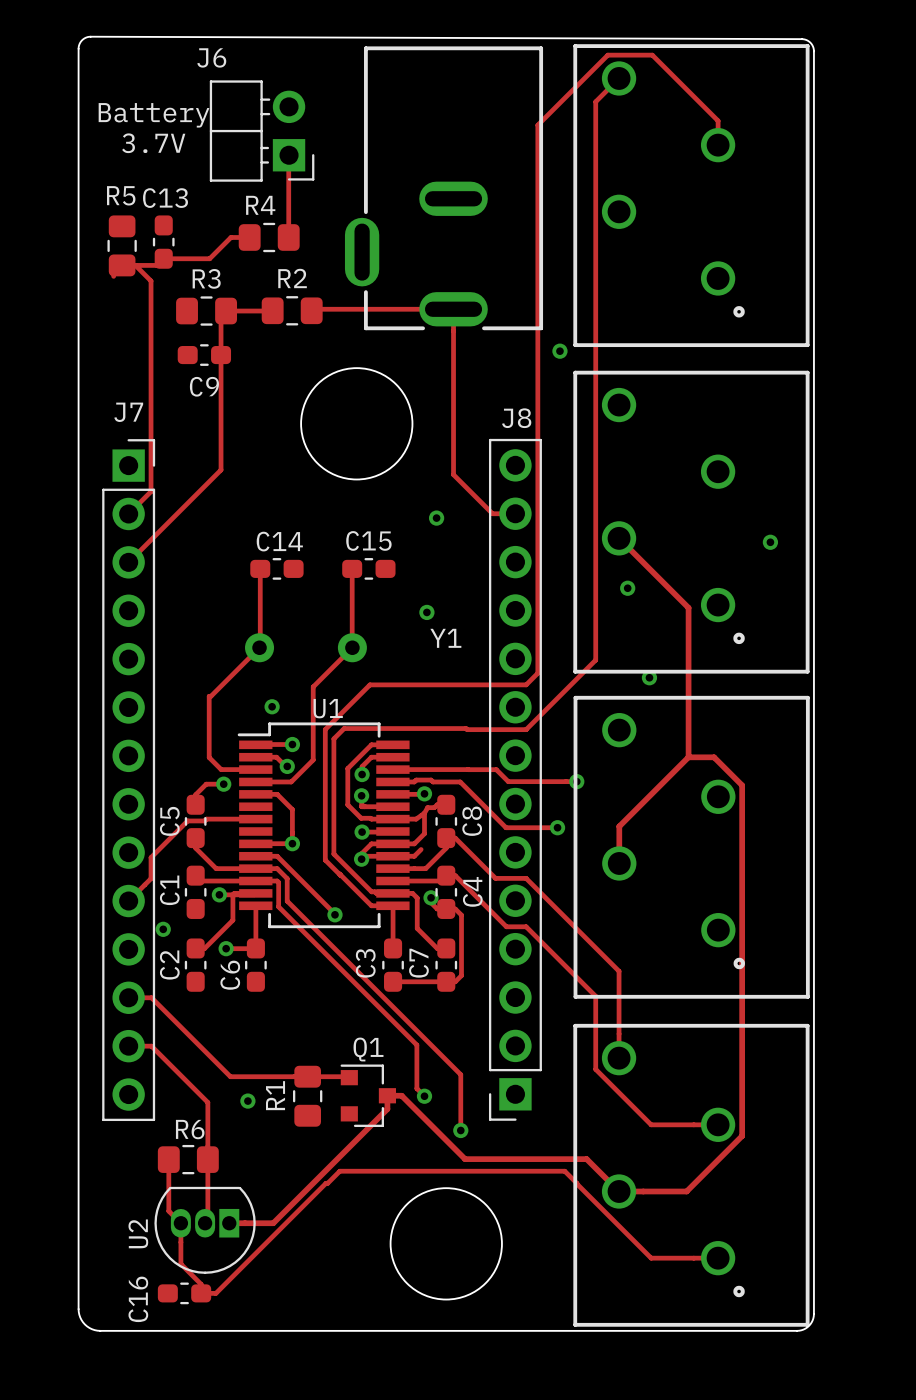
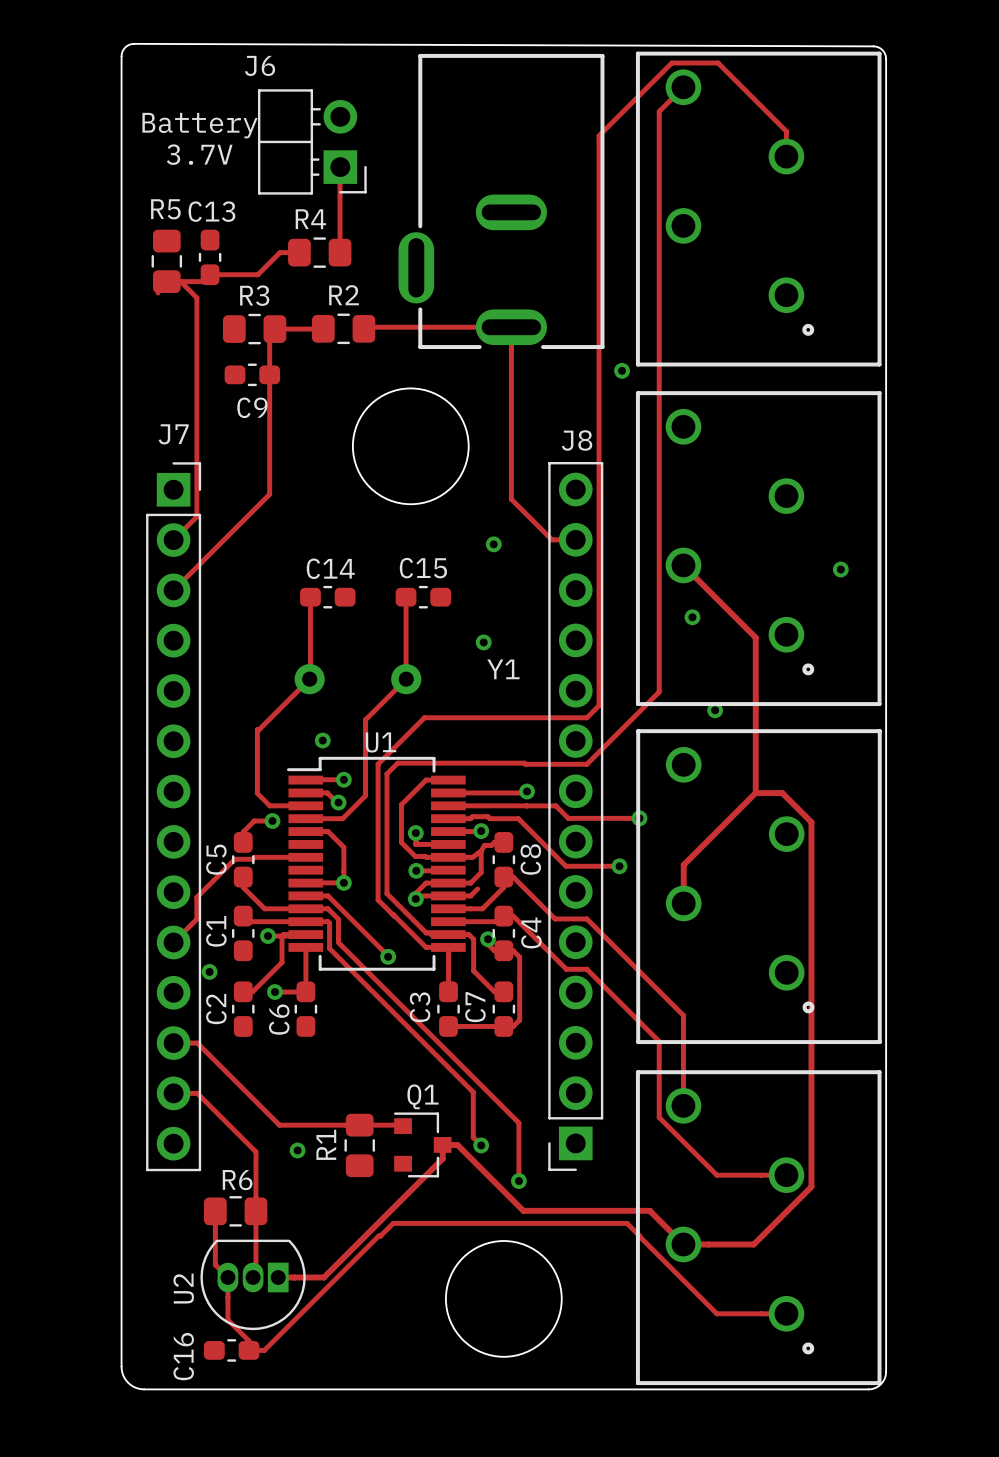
track: (392, 757) (371, 757) (362, 766) (362, 774) -> (448, 792) (527, 791)
via position: (362, 774) -> (527, 791)

